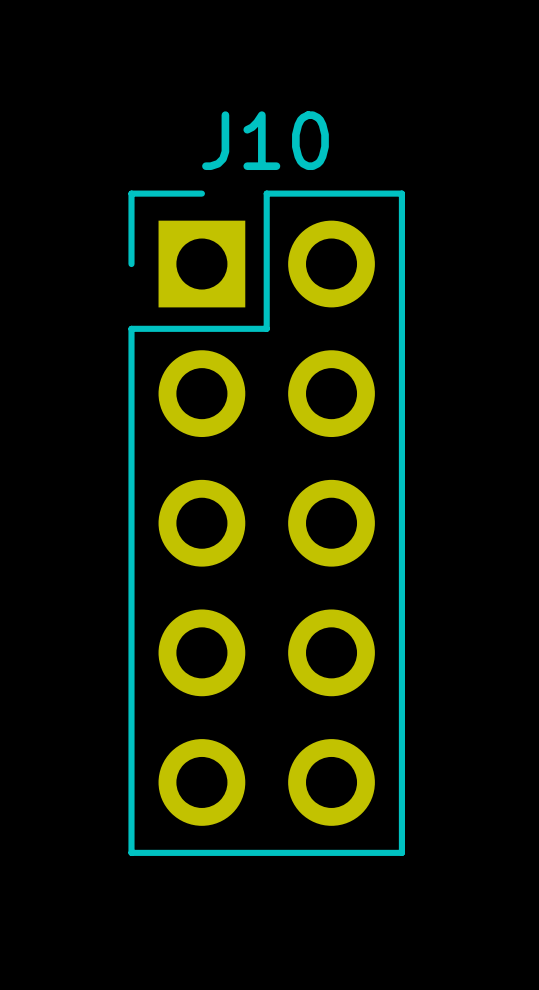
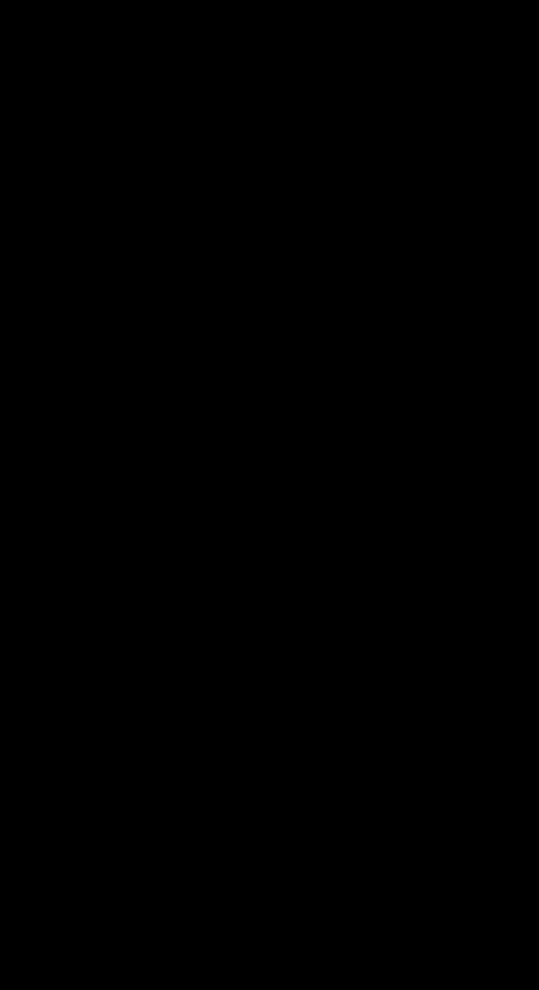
J10: (266, 523) -> none

